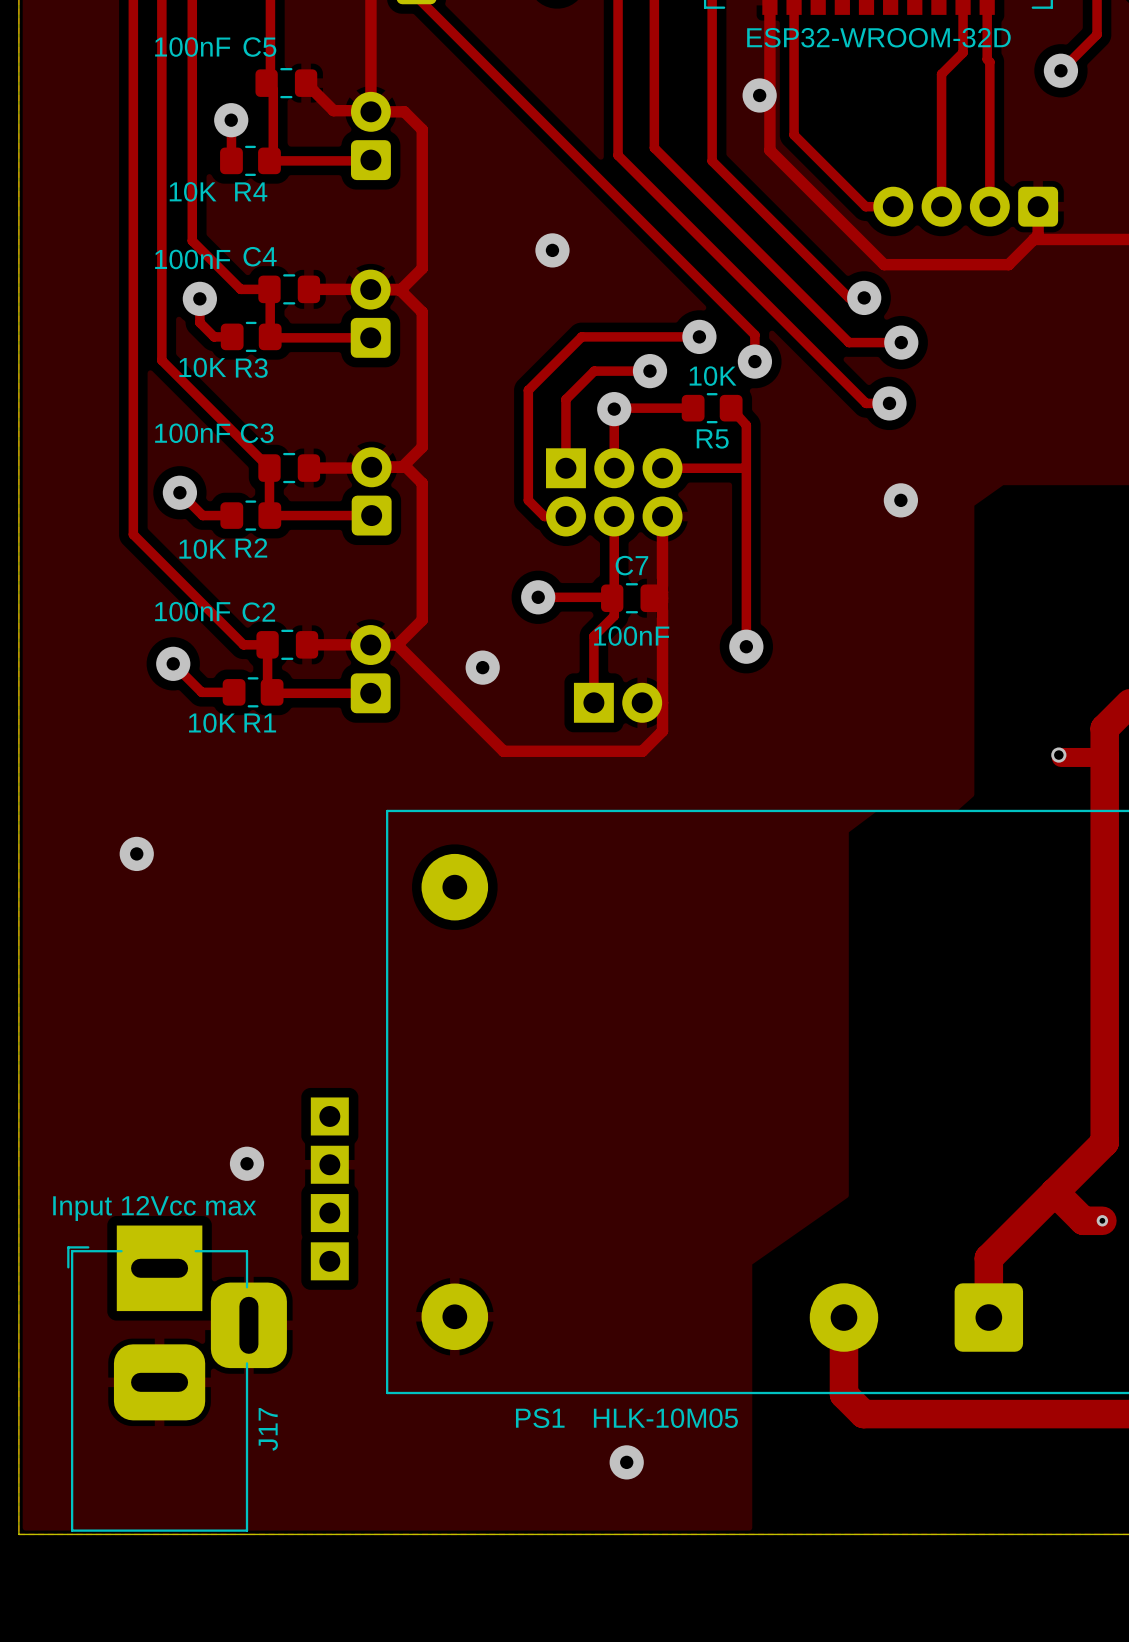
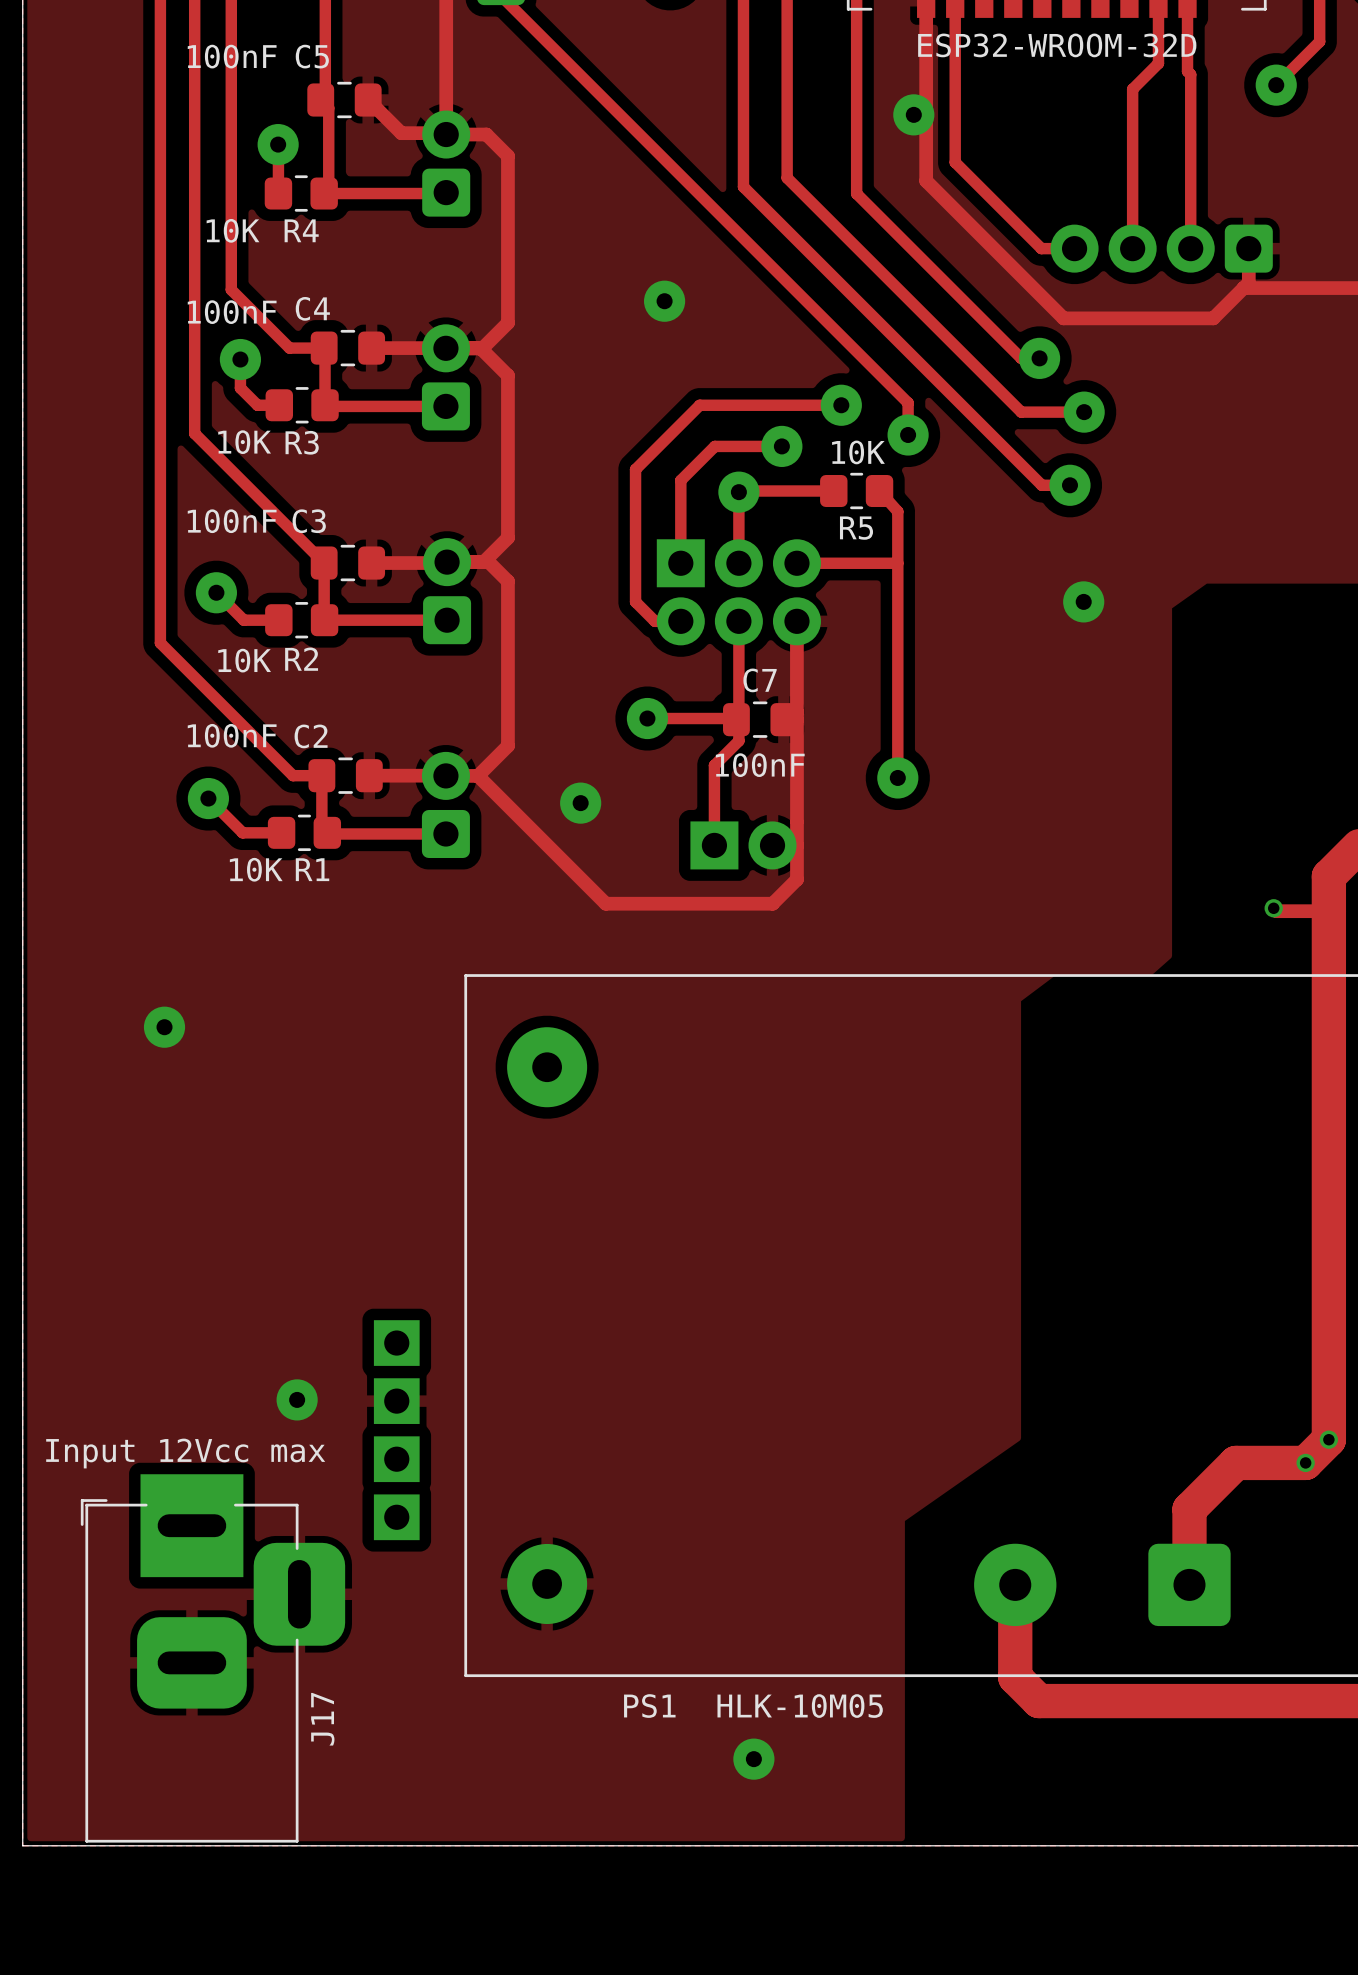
track width: thick (1061, 757) (1104, 757) -> thin (1276, 911) (1328, 911)
track: (1104, 1142) (988, 1258) -> (1328, 1374) (1328, 1439) (1305, 1462) (1235, 1462) (1189, 1509) (1189, 1513)
track: (1054, 1192) (1083, 1220) (1102, 1220) -> none
via: none -> (1328, 1439)
via: none -> (1305, 1462)
via: (1102, 1220) -> none

